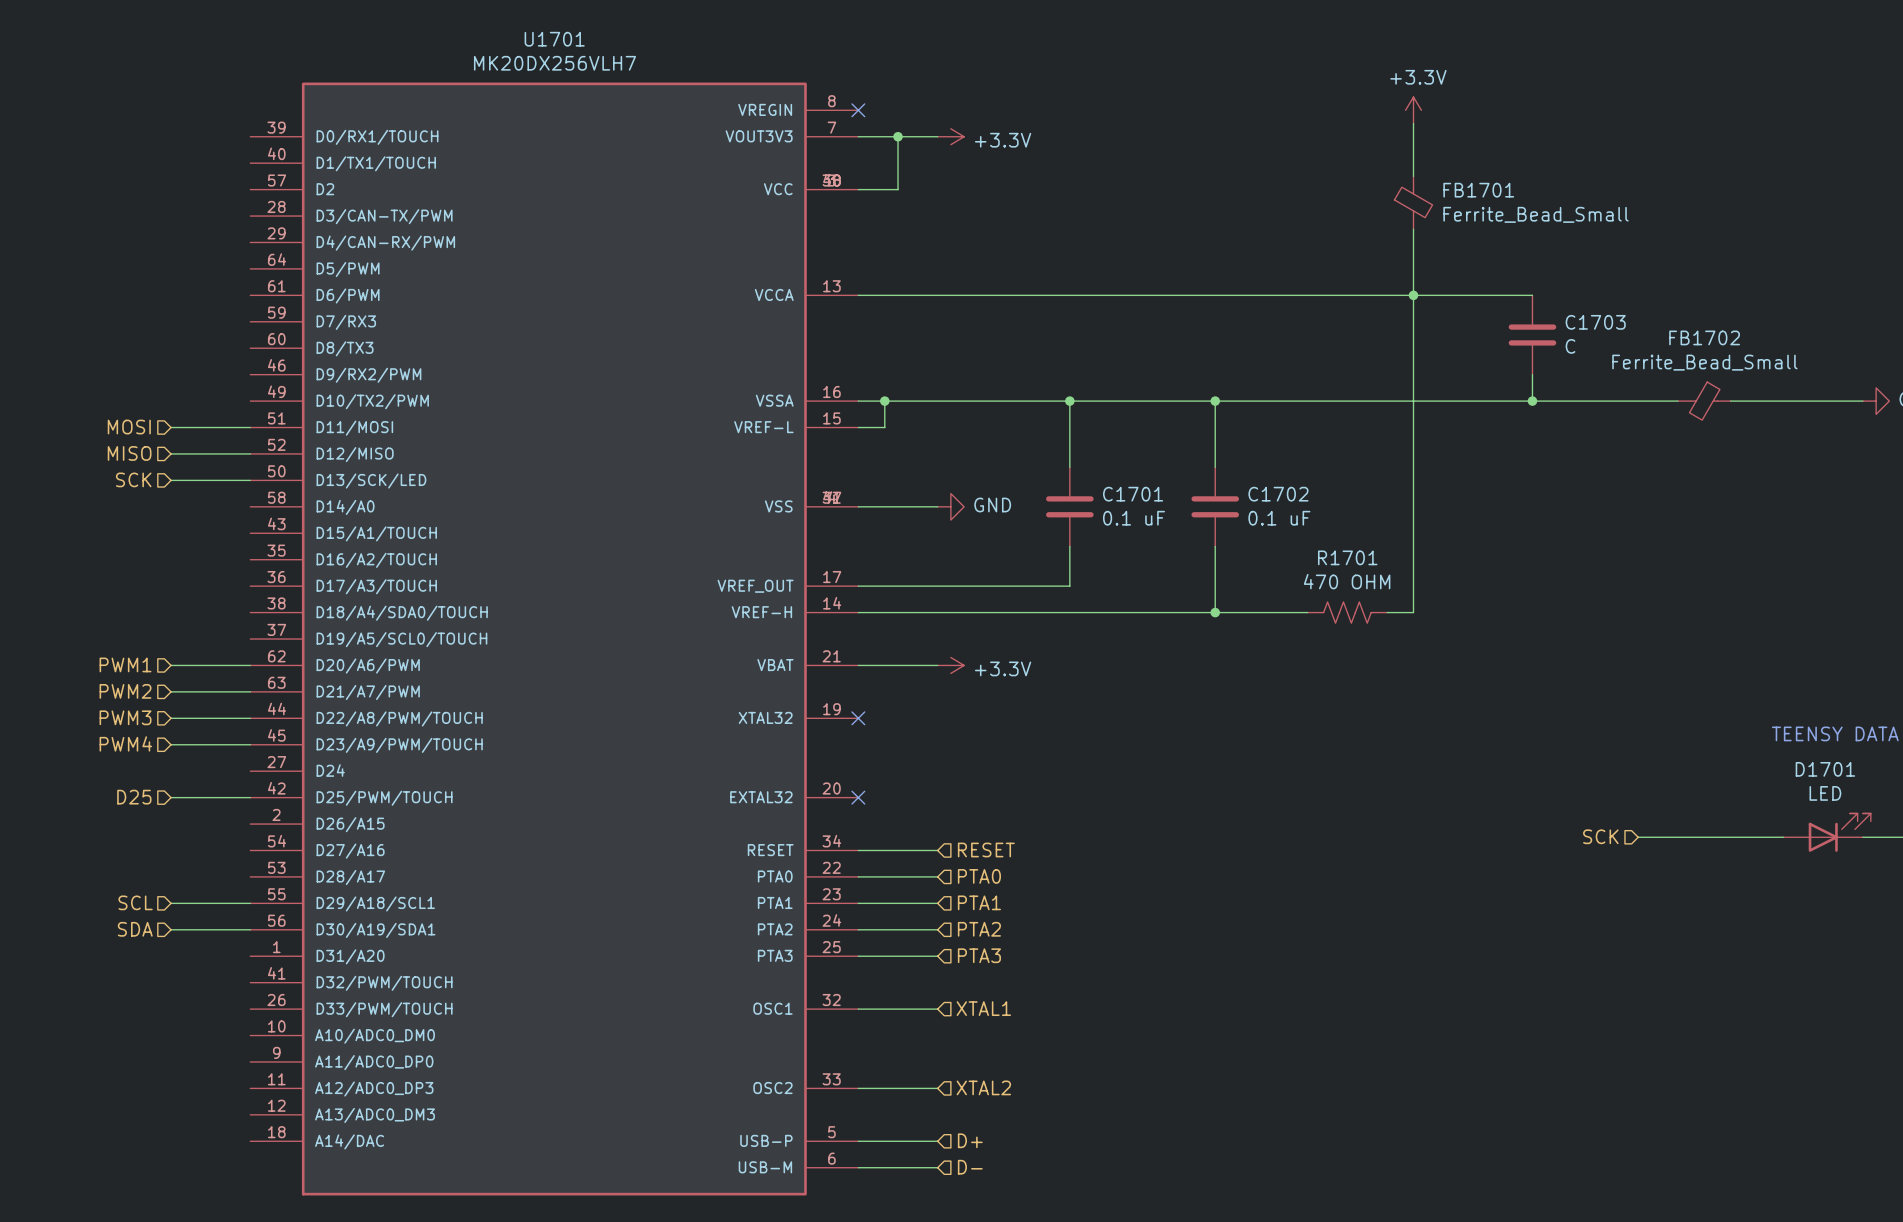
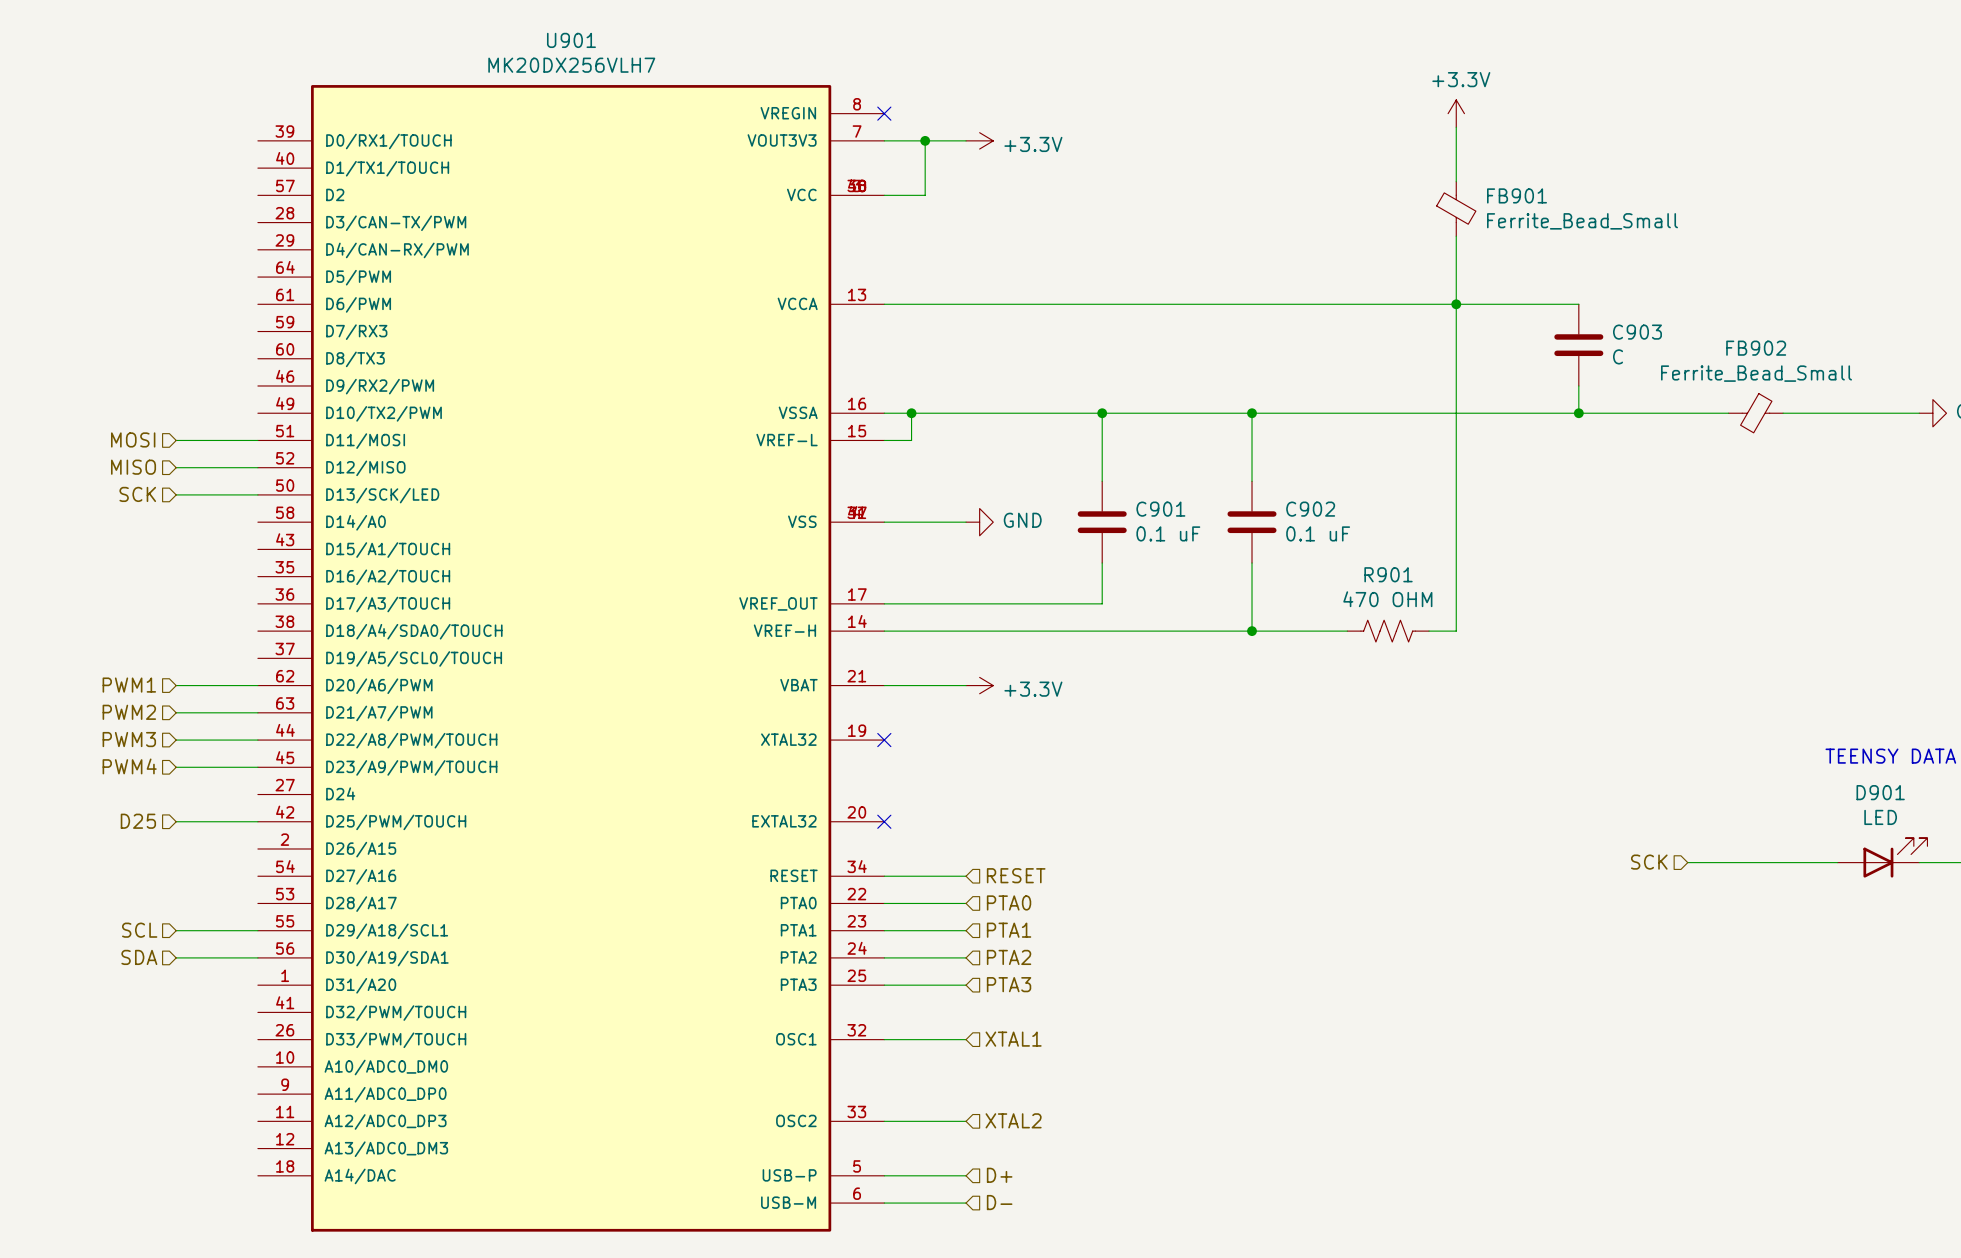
U1701 name: U1701 (554, 39) -> U901 (571, 40)
FB1701 name: FB1701 (1478, 190) -> FB901 (1517, 195)
C1703 name: C1703 (1595, 322) -> C903 (1637, 332)
FB1702 name: FB1702 (1704, 337) -> FB902 (1756, 348)
C1701 name: C1701 (1133, 494) -> C901 (1160, 509)
C1702 name: C1702 (1278, 494) -> C902 (1310, 509)
R1701 name: R1701 (1347, 557) -> R901 (1388, 574)
D1701 name: D1701 (1825, 769) -> D901 (1880, 792)

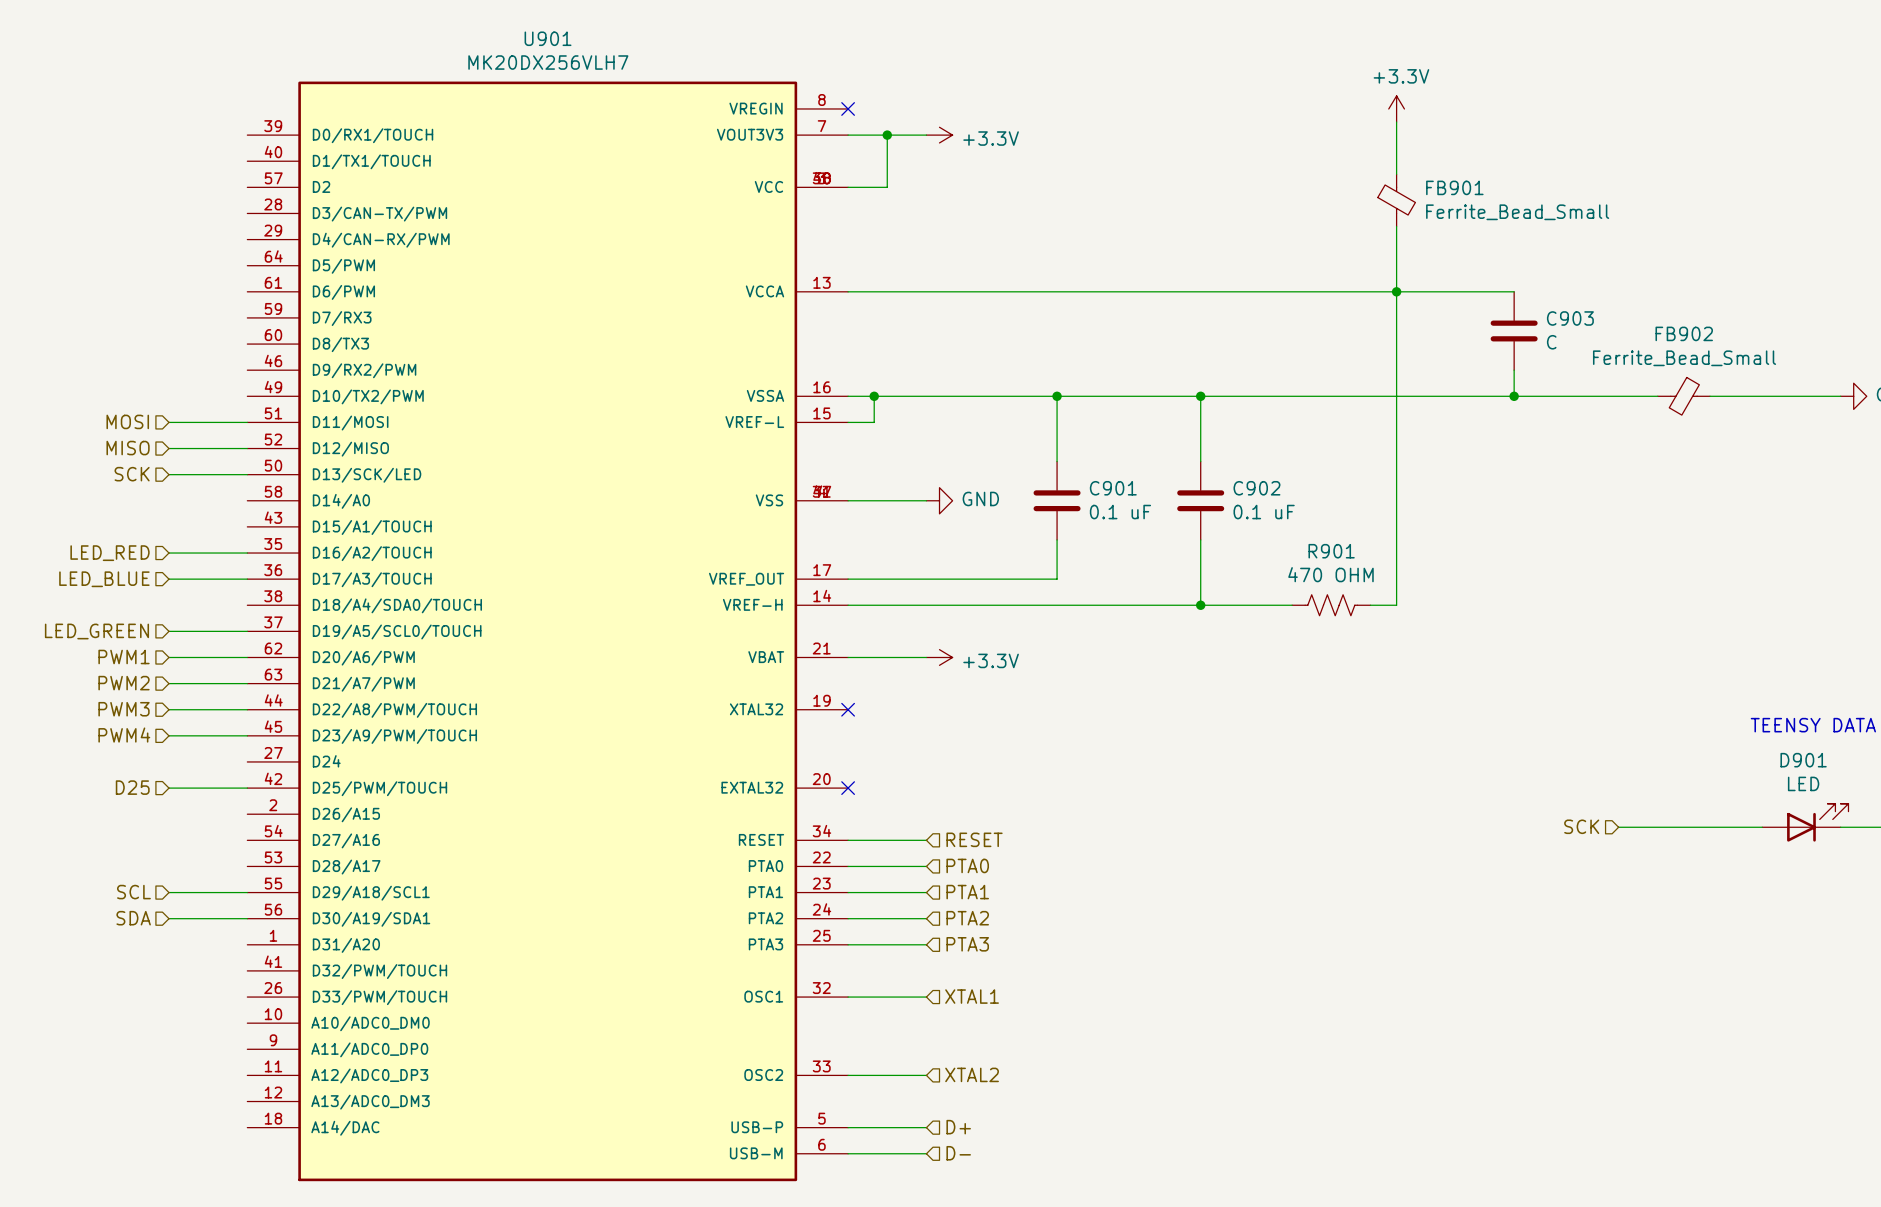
hierarchical label: none -> LED_RED (110, 553)
wire: none -> (168, 553) (247, 553)
wire: none -> (168, 579) (247, 579)
hierarchical label: none -> LED_BLUE (104, 579)
hierarchical label: none -> LED_GREEN (96, 631)
wire: none -> (168, 631) (247, 631)

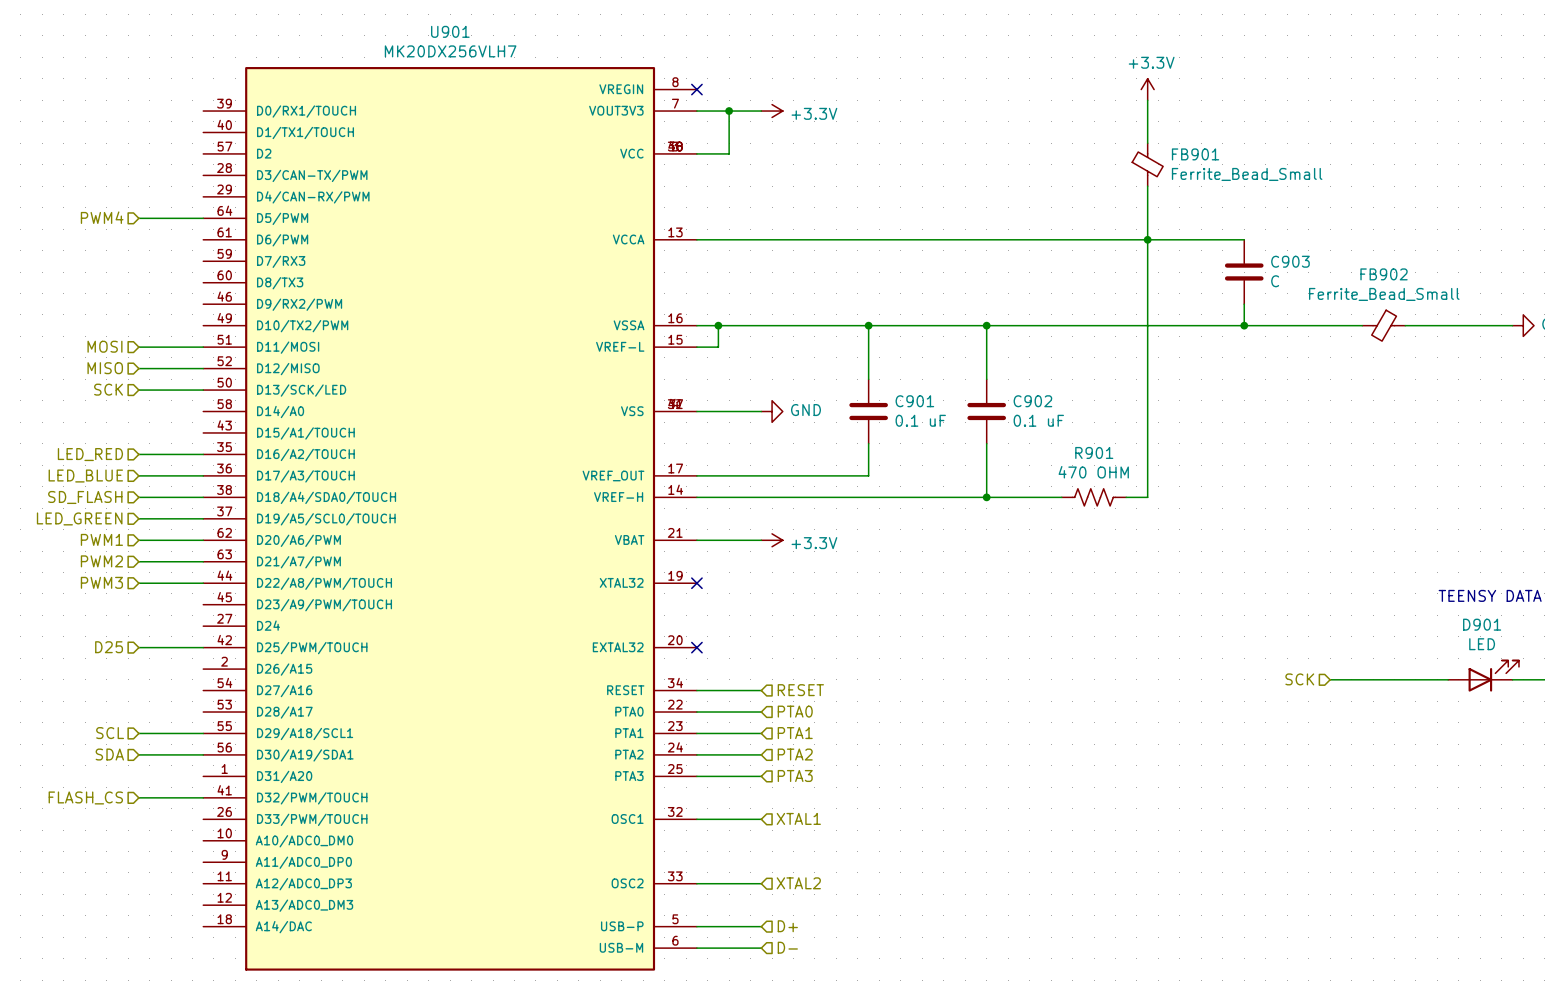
hierarchical label: none -> PWM4 (102, 217)
wire: none -> (138, 218) (203, 218)
hierarchical label: none -> SD_FLASH (85, 497)
hierarchical label: PWM4 (124, 735) -> none
wire: (168, 735) (247, 735) -> (138, 497) (203, 497)
wire: none -> (138, 797) (203, 797)
hierarchical label: none -> FLASH_CS (85, 797)

